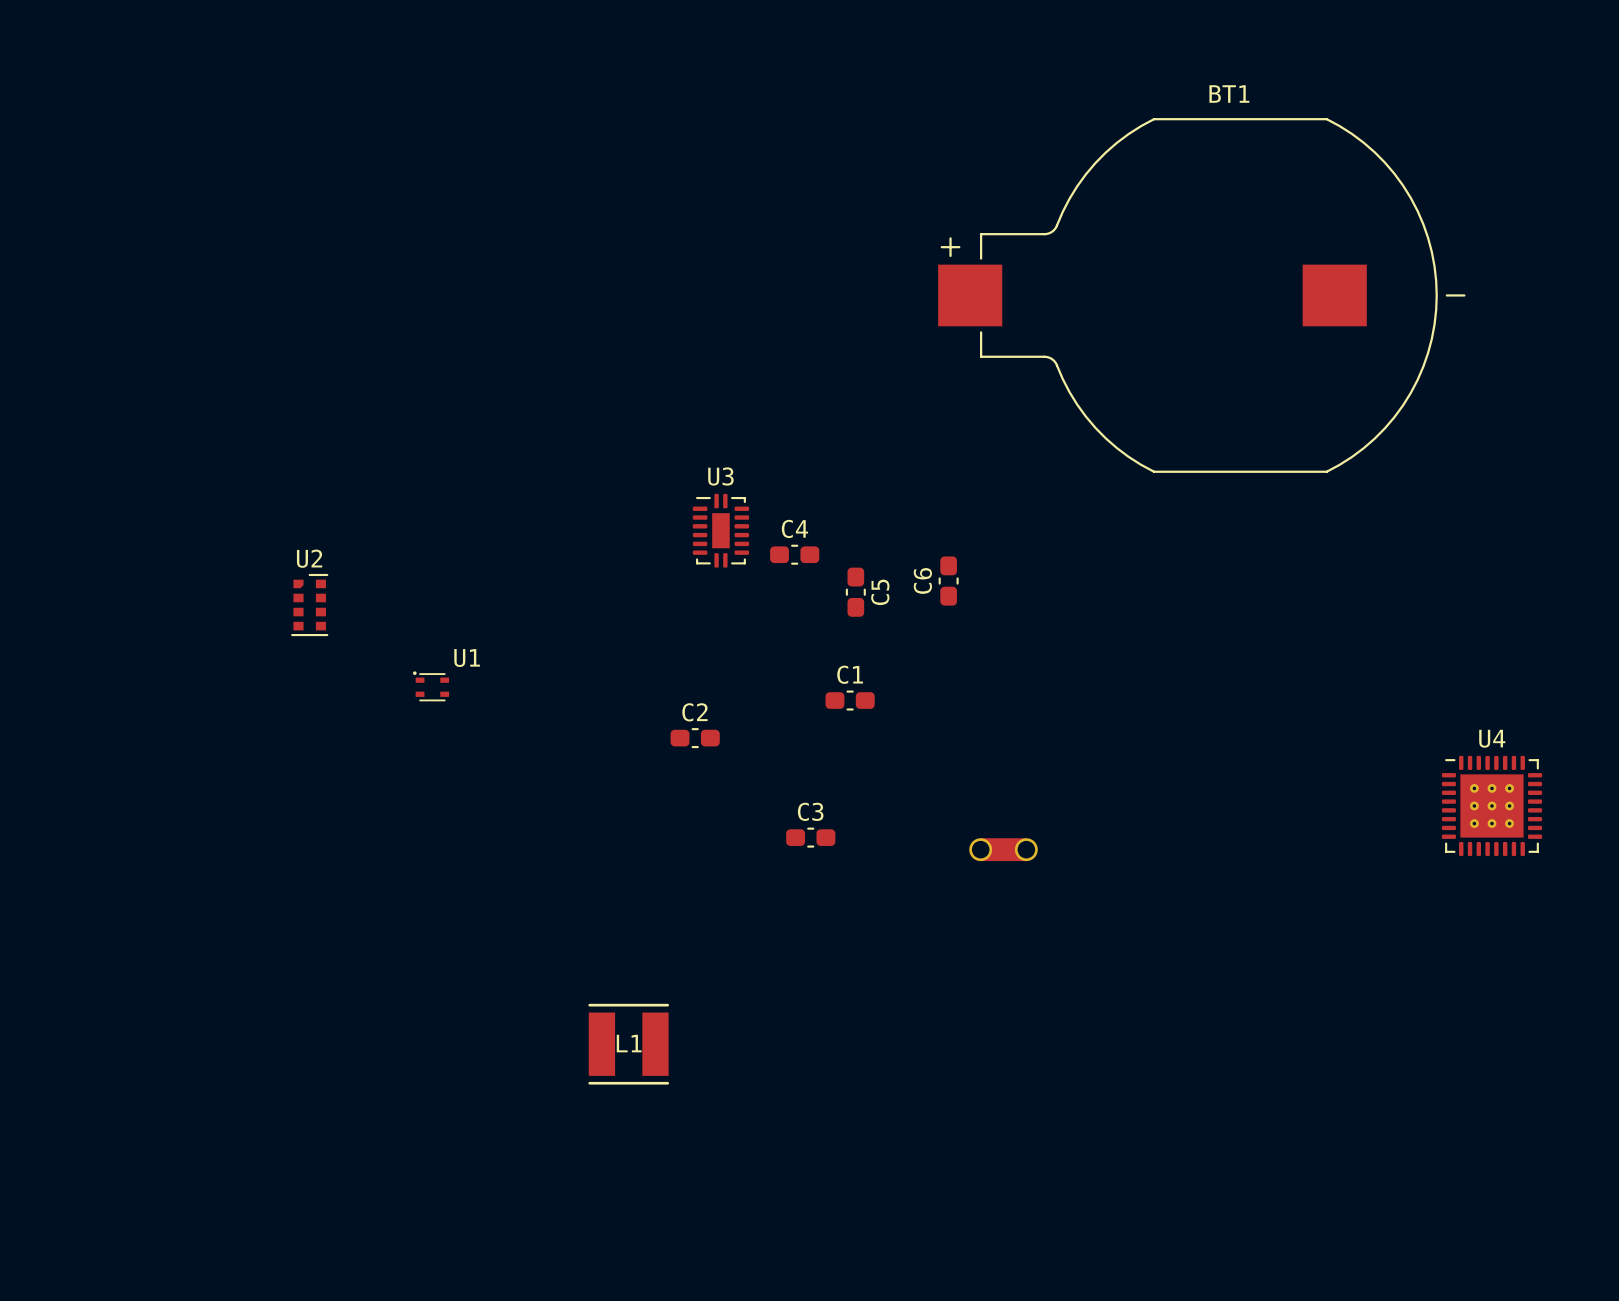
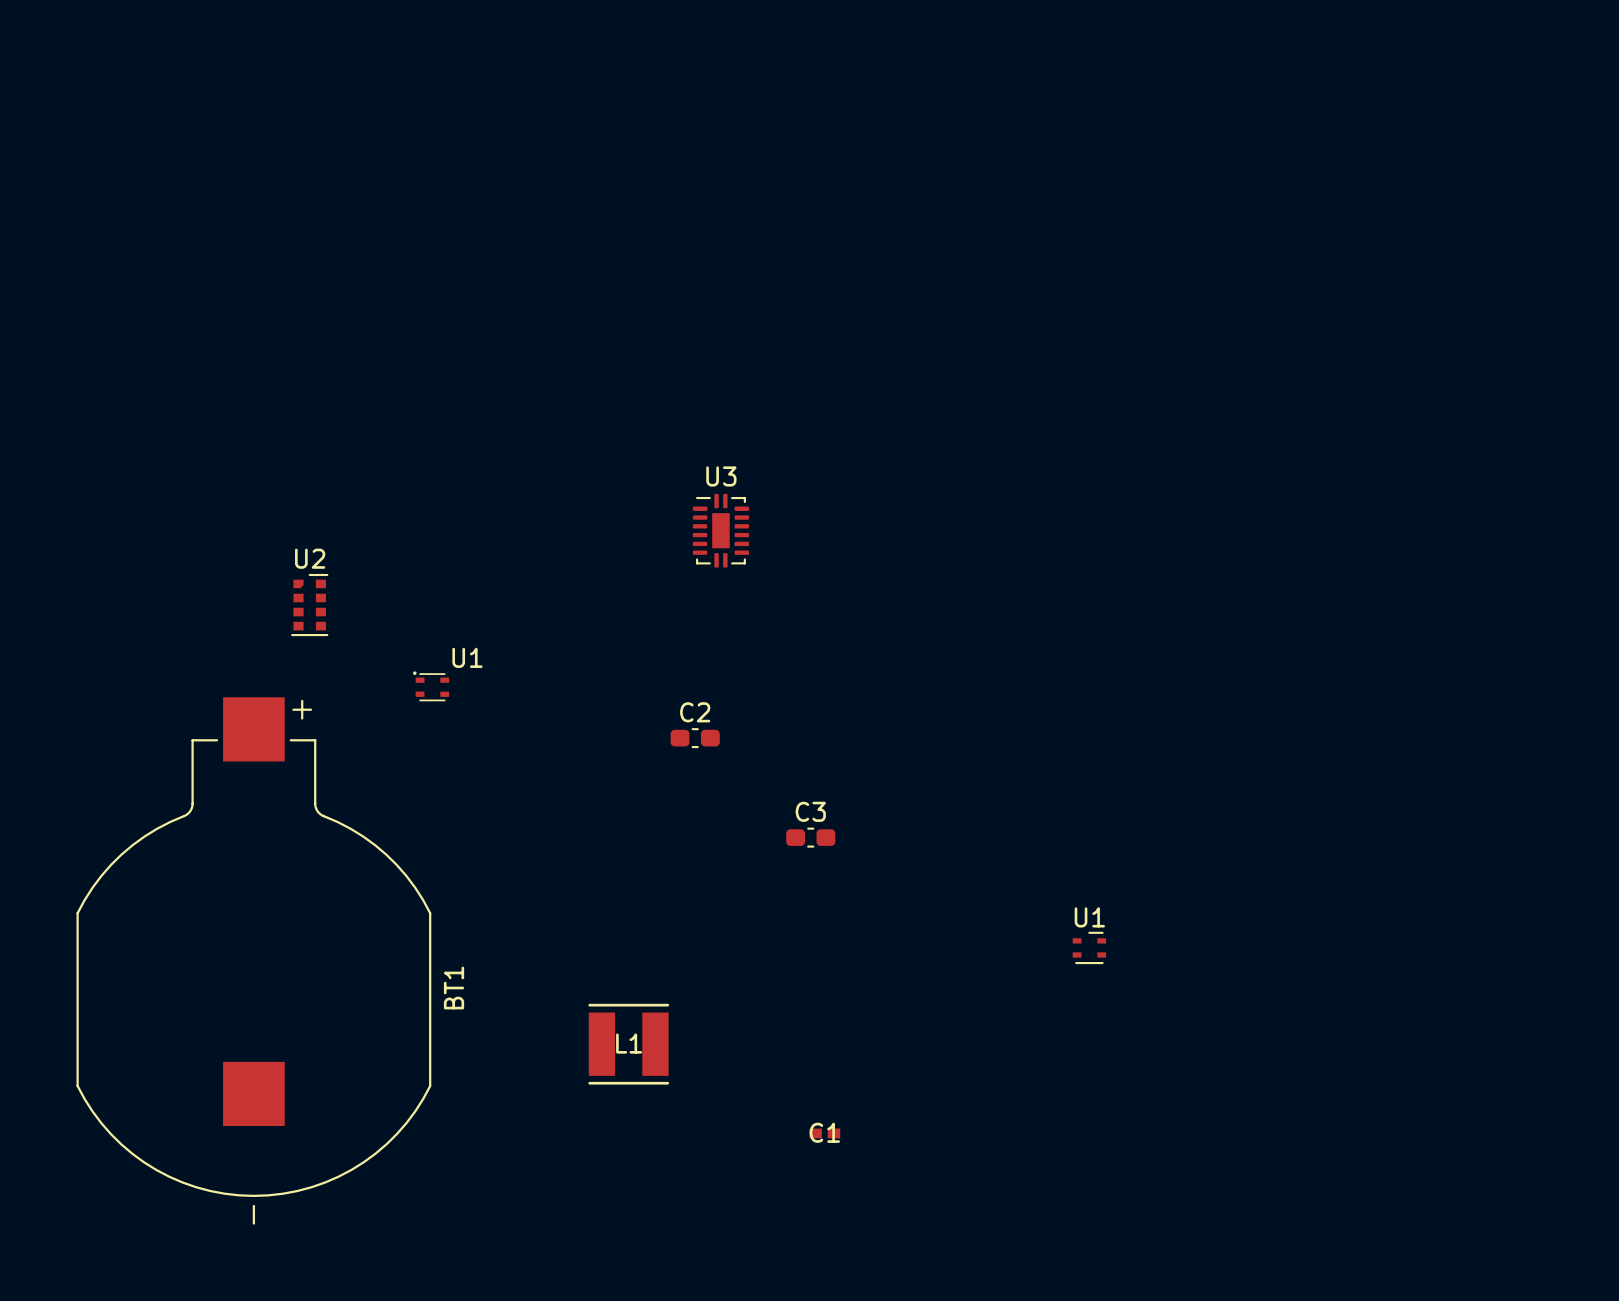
BT1 rotation: 0° (1201, 295) -> 90° clockwise (253, 961)
BT1 position: (1201, 295) -> (253, 961)
C4: (794, 554) -> none
C6: (948, 581) -> none
C5: (855, 592) -> none
C1 footprint: [825, 690, 875, 711] -> [809, 1128, 841, 1139]
U4: (1491, 805) -> none
part: (1003, 849) -> none
U1: none -> (1089, 947)

